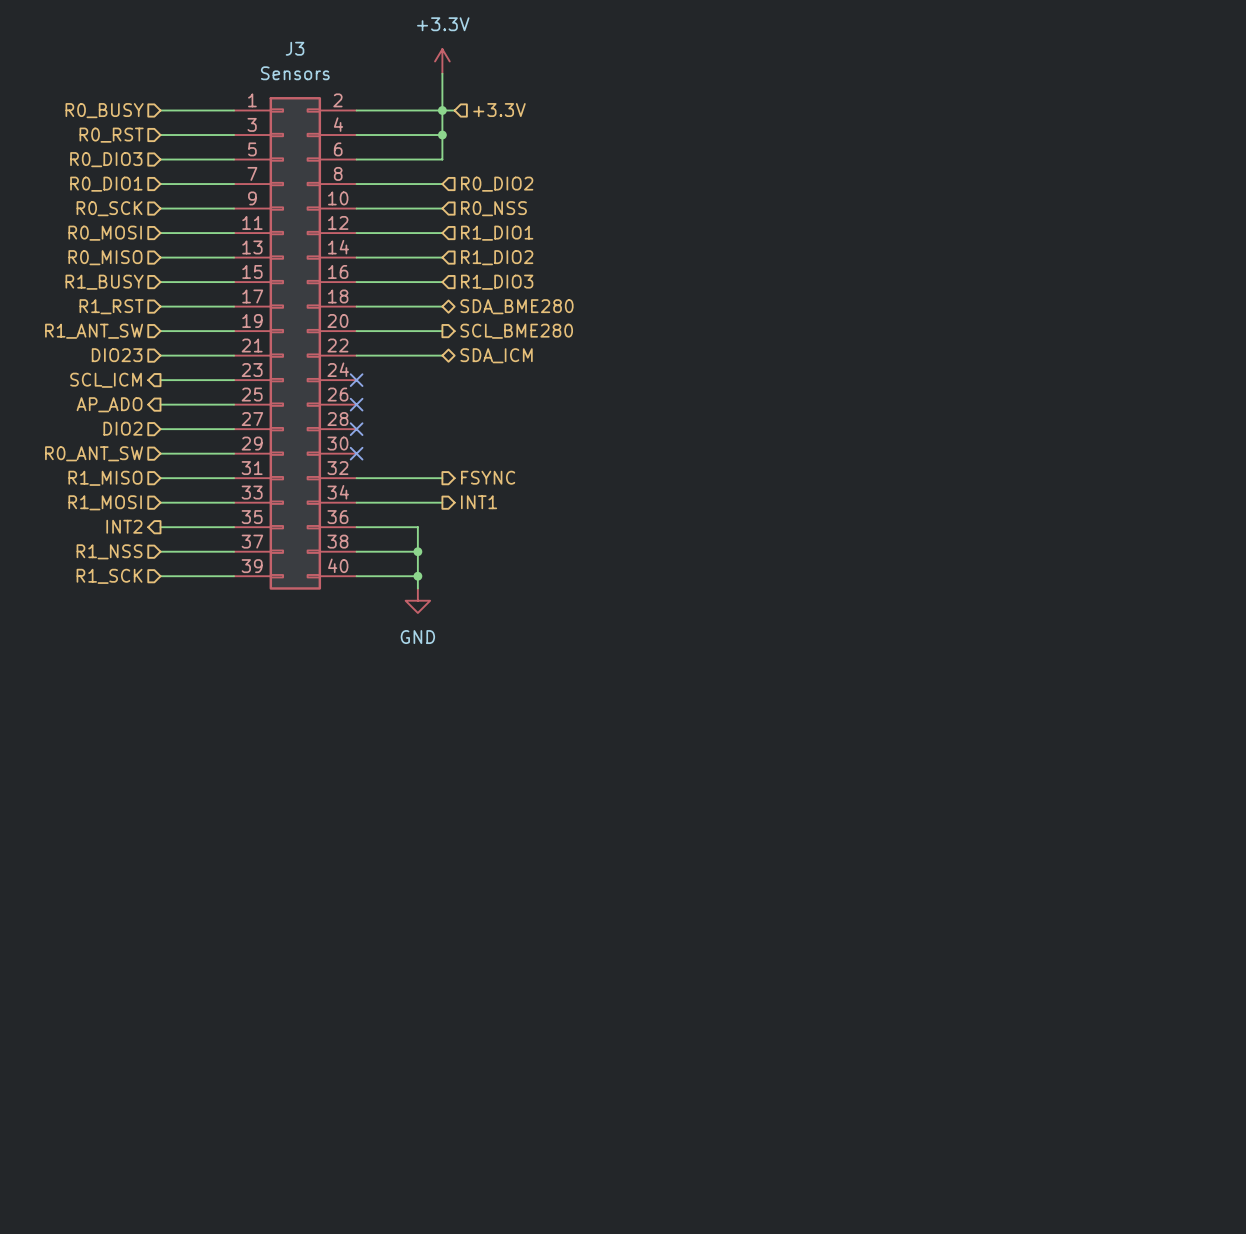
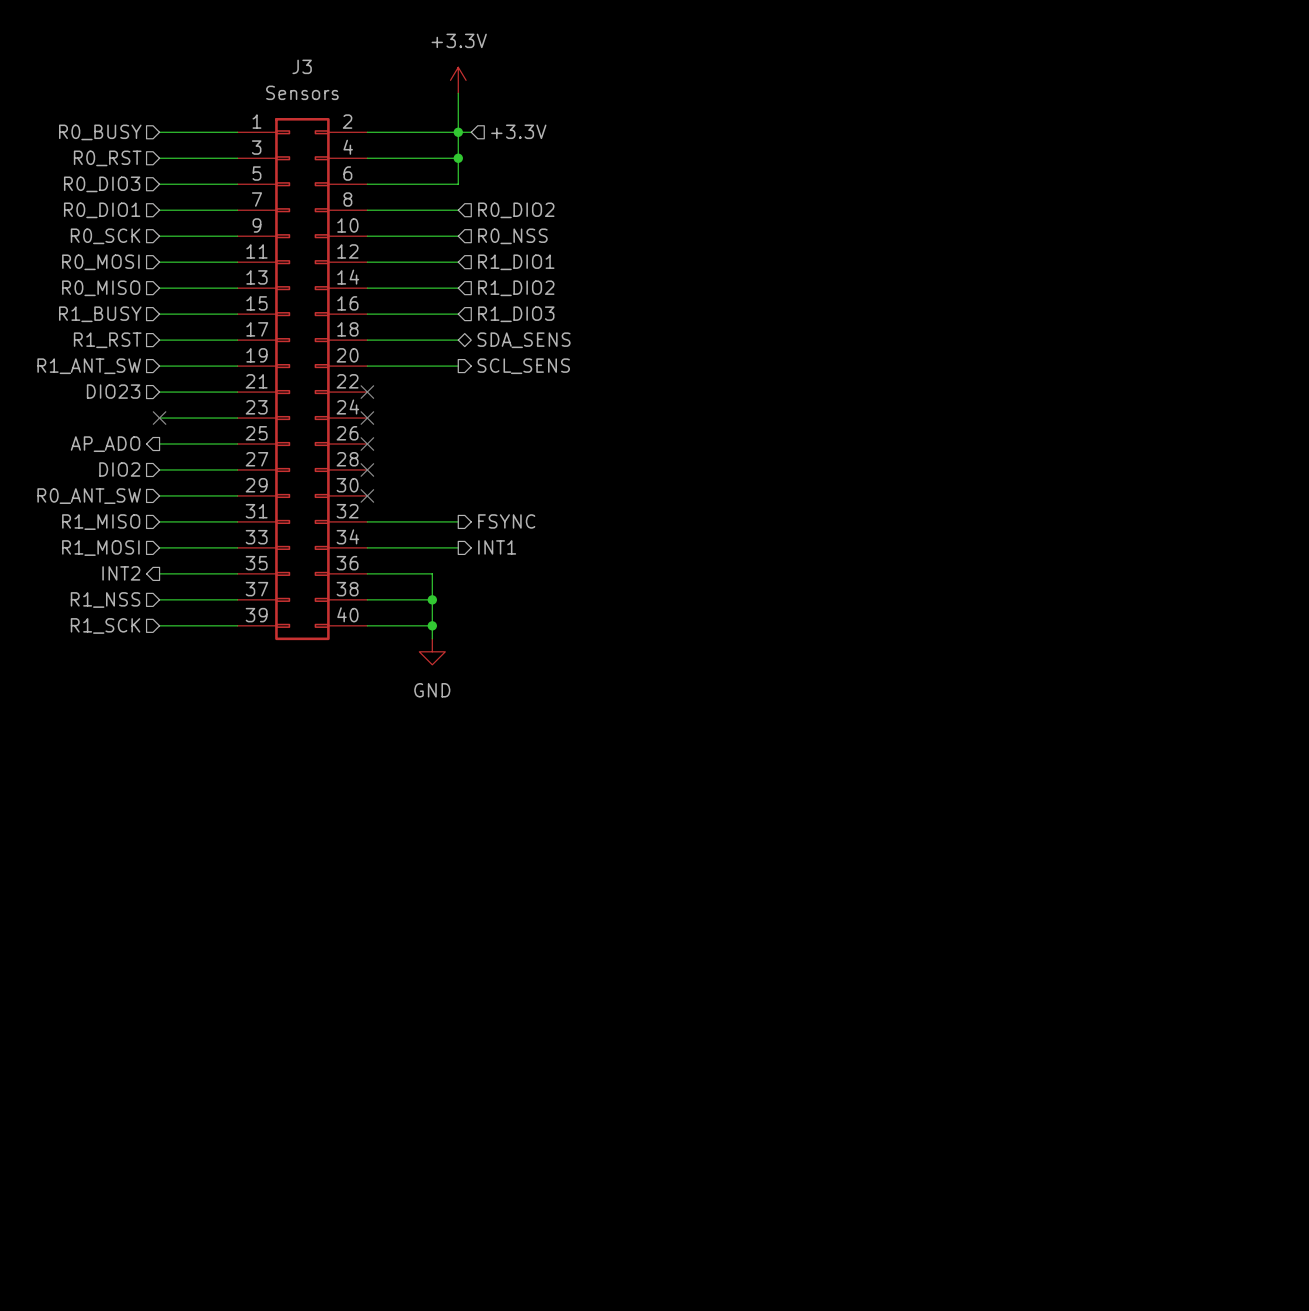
hierarchical label: SDA_BME280 (516, 306) -> SDA_SENS (524, 340)
hierarchical label: SCL_BME280 (516, 331) -> SCL_SENS (523, 366)
wire: (356, 355) (442, 355) -> none
no-connect mark: none -> (367, 392)
hierarchical label: SDA_ICM (496, 355) -> none
hierarchical label: SCL_ICM (106, 380) -> none
no-connect mark: none -> (159, 418)

